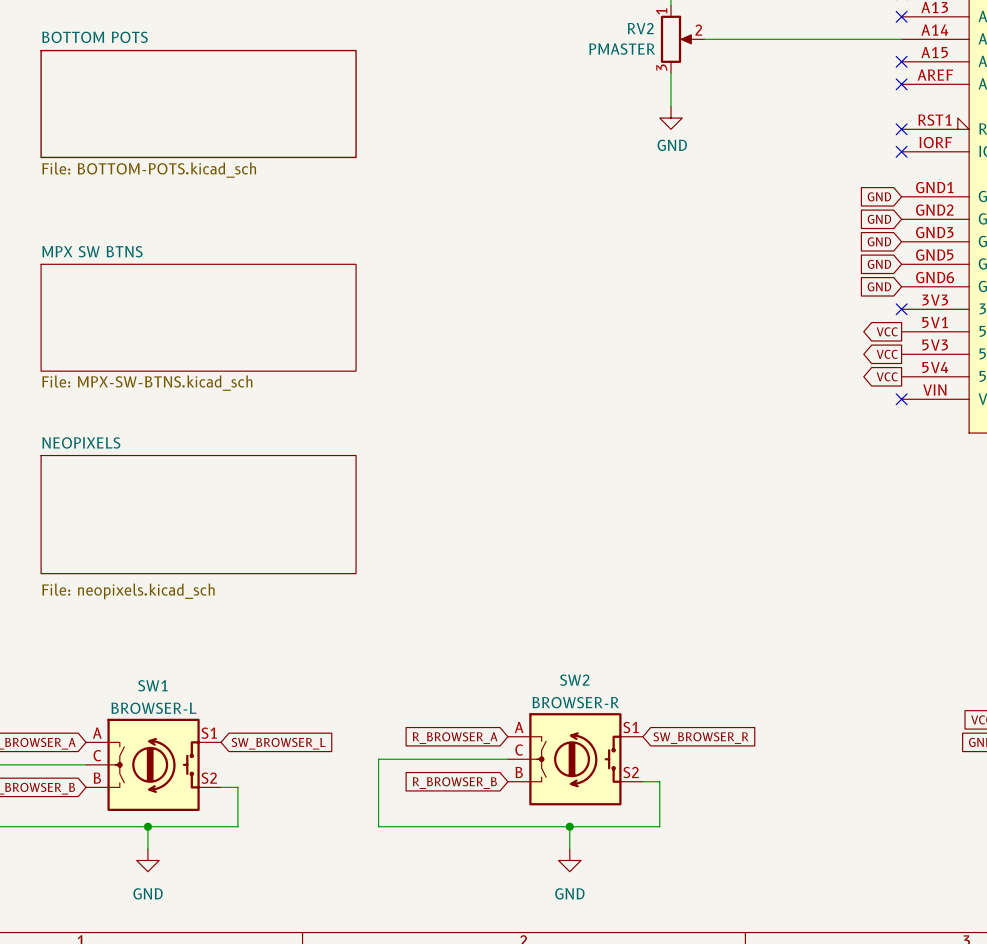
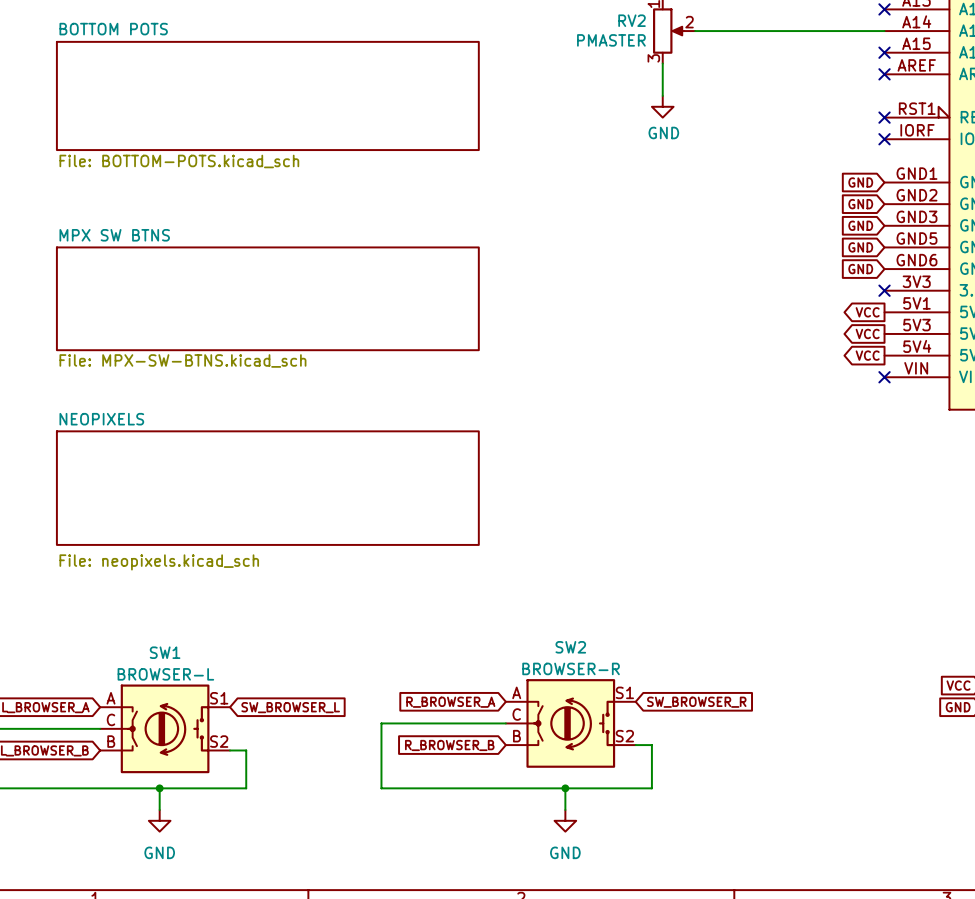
sheet BOTTOM POTS: File: BOTTOM-POTS.kicad_sch (198, 104) -> none
sheet BOTTOM POTS: none -> File: BOTTOM-POTS.kicad_sch (267, 95)
sheet MPX SW BTNS: File: MPX-SW-BTNS.kicad_sch (198, 317) -> none
sheet MPX SW BTNS: none -> File: MPX-SW-BTNS.kicad_sch (267, 298)
sheet NEOPIXELS: File: neopixels.kicad_sch (198, 514) -> none
sheet NEOPIXELS: none -> File: neopixels.kicad_sch (267, 488)

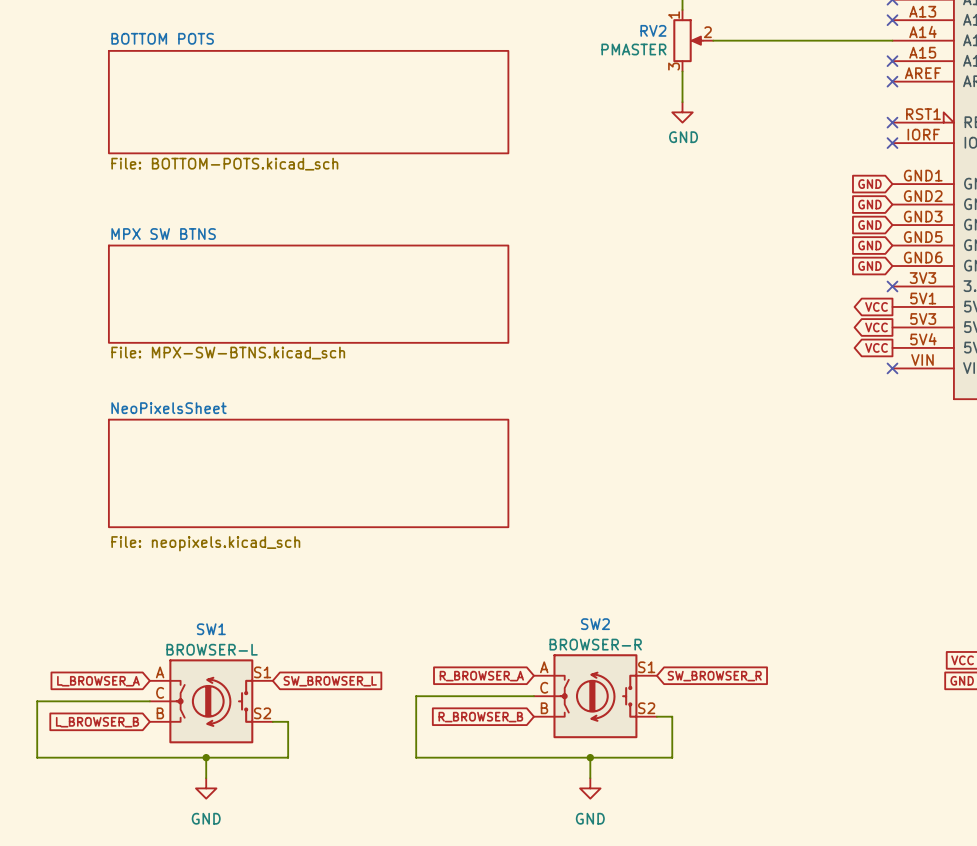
sheet NEOPIXELS name: NEOPIXELS (101, 419) -> NeoPixelsSheet (168, 408)

